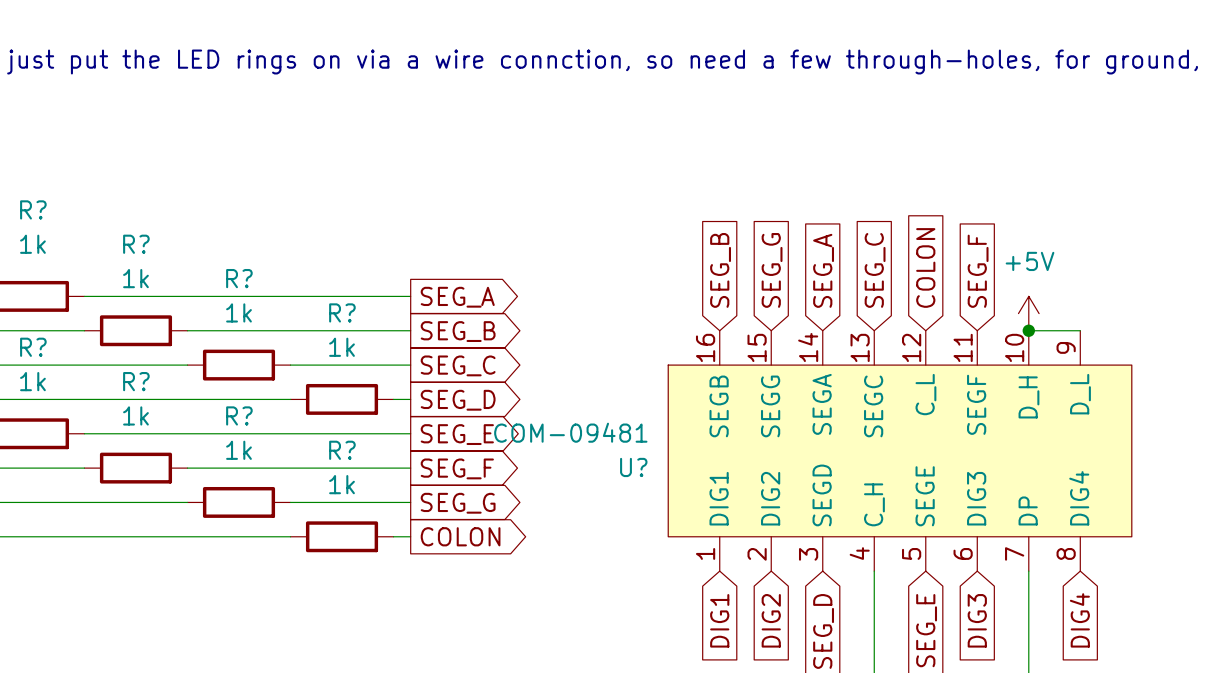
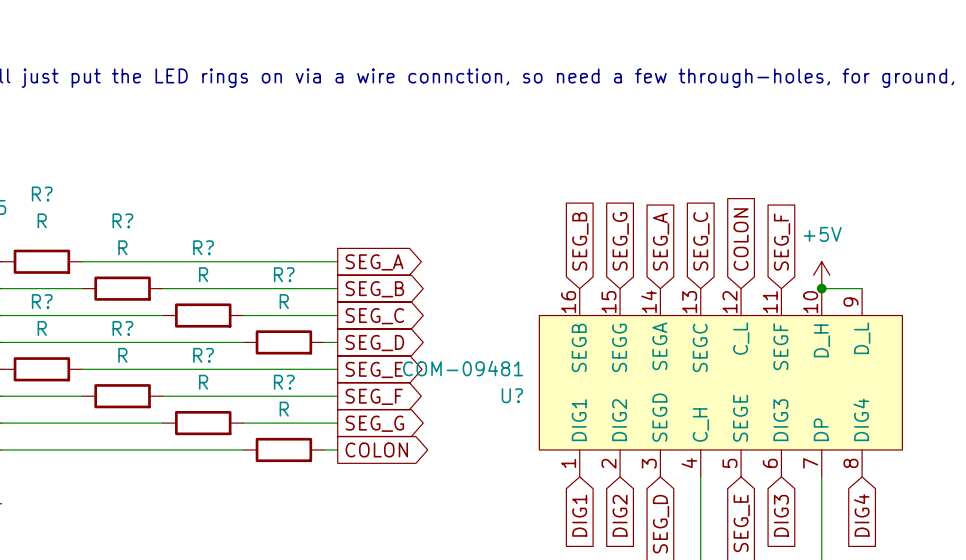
R? value: 1k (32, 244) -> R (42, 220)
R? value: 1k (135, 278) -> R (122, 247)
R? value: 1k (238, 312) -> R (203, 274)
R? value: 1k (342, 347) -> R (284, 301)
R? value: 1k (32, 381) -> R (42, 328)
R? value: 1k (135, 415) -> R (122, 355)
R? value: 1k (238, 450) -> R (203, 382)
R? value: 1k (342, 484) -> R (284, 409)

